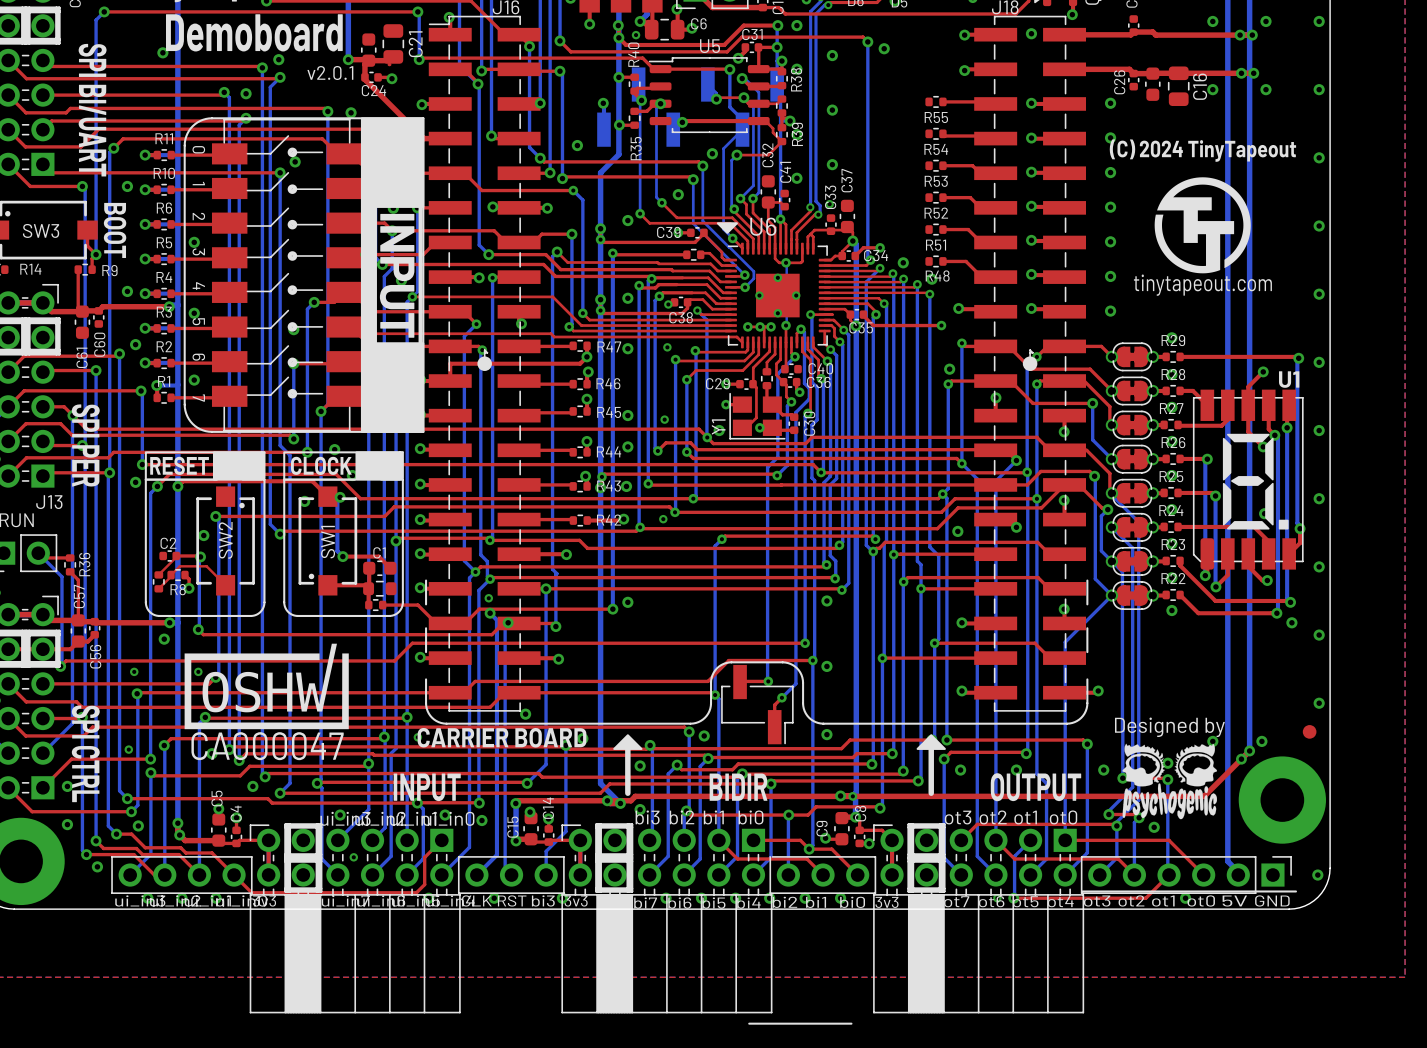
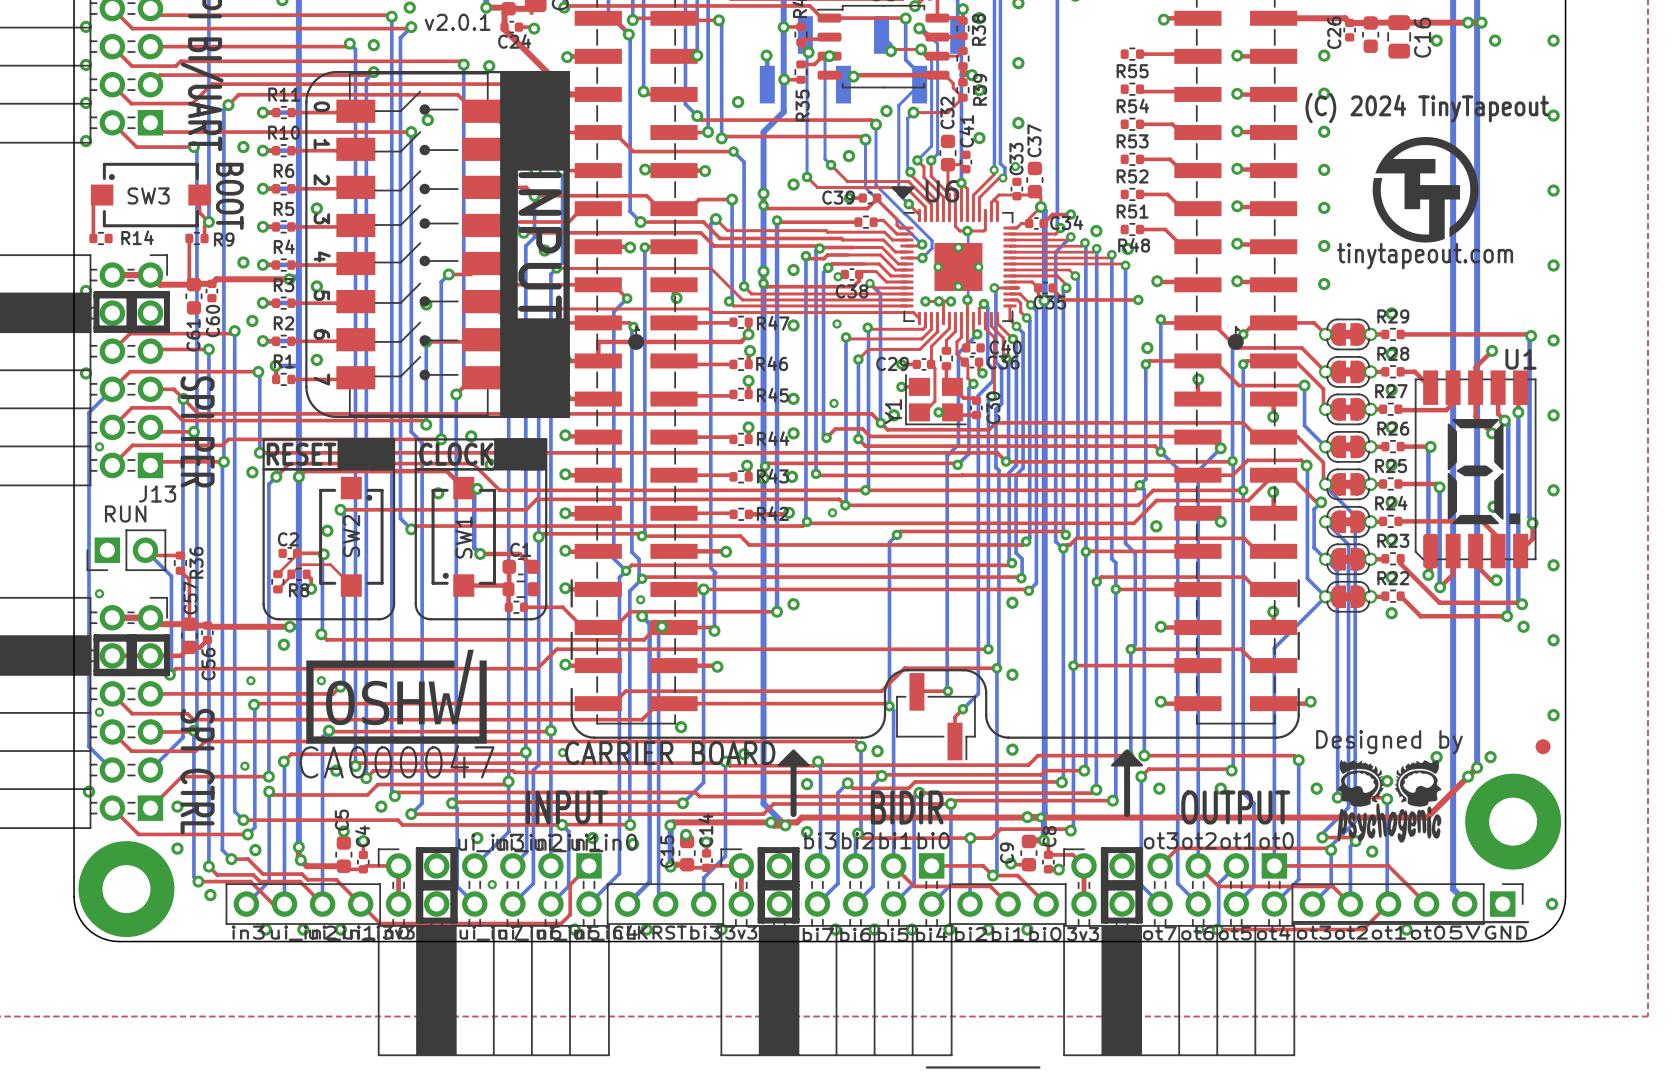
text: ui_in3 (140, 900) -> in3 (248, 932)

